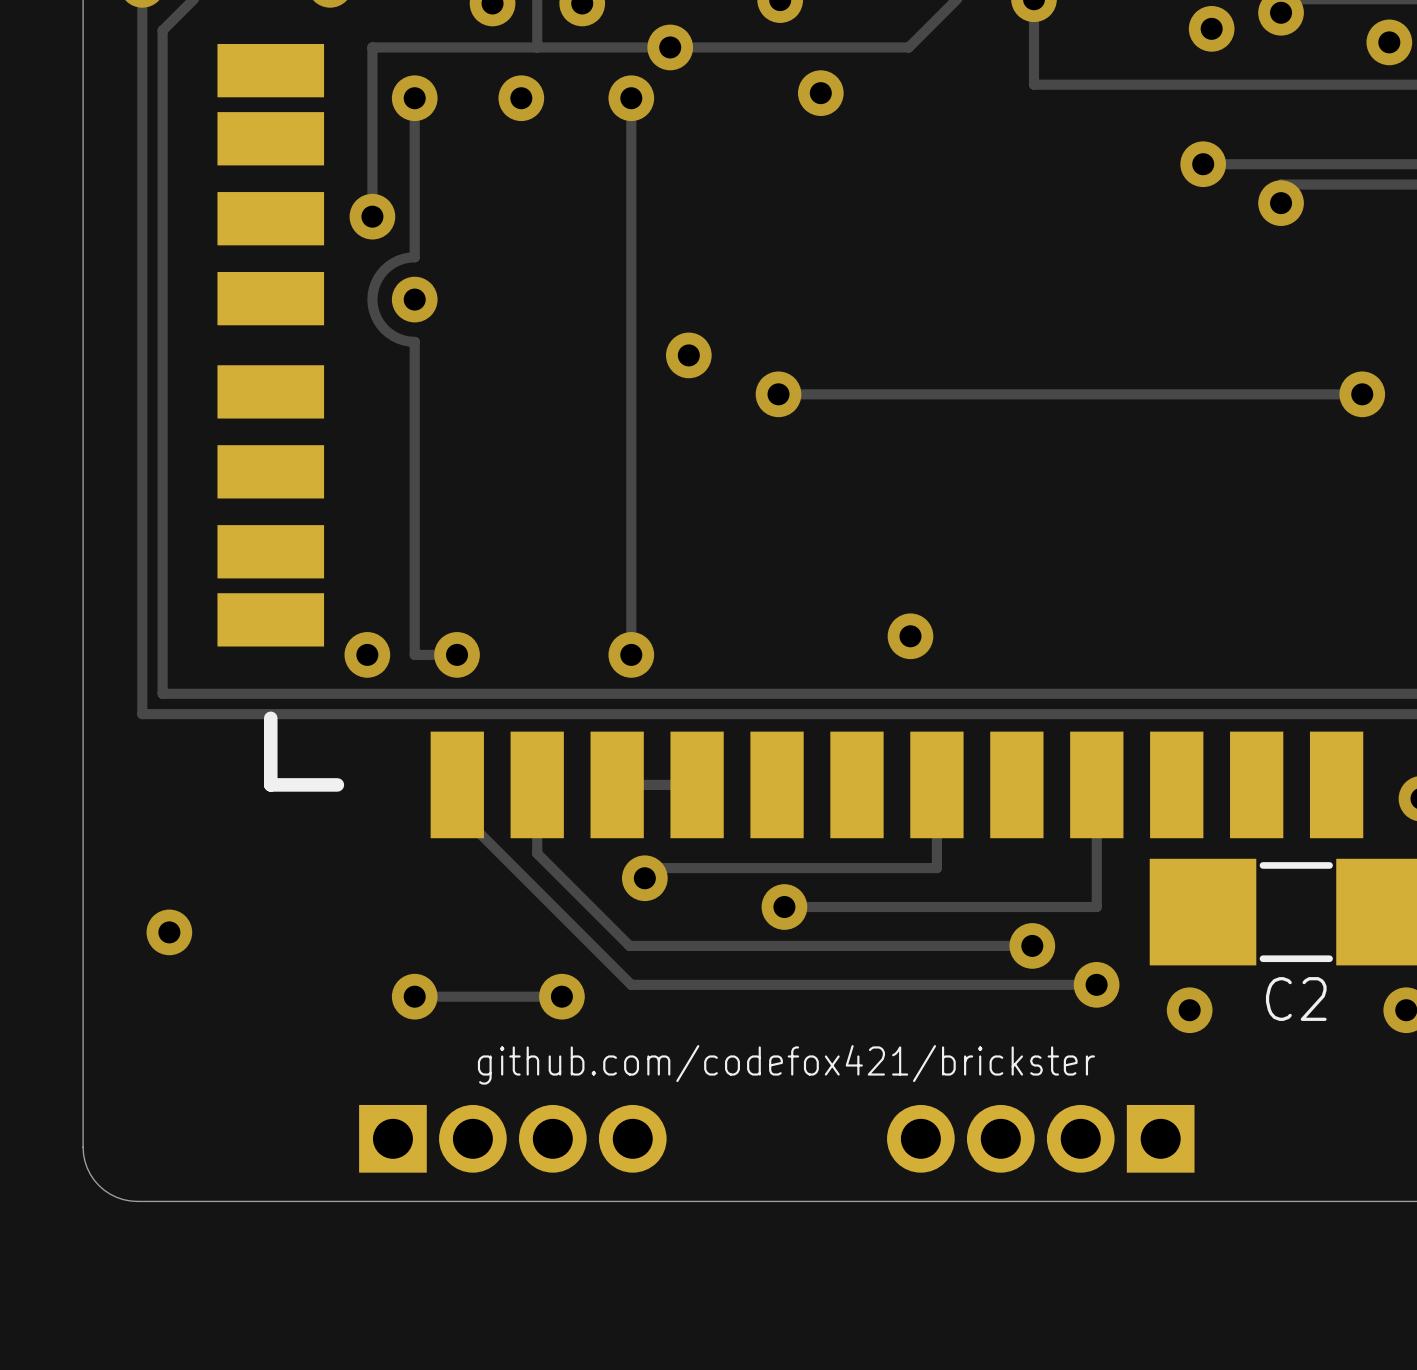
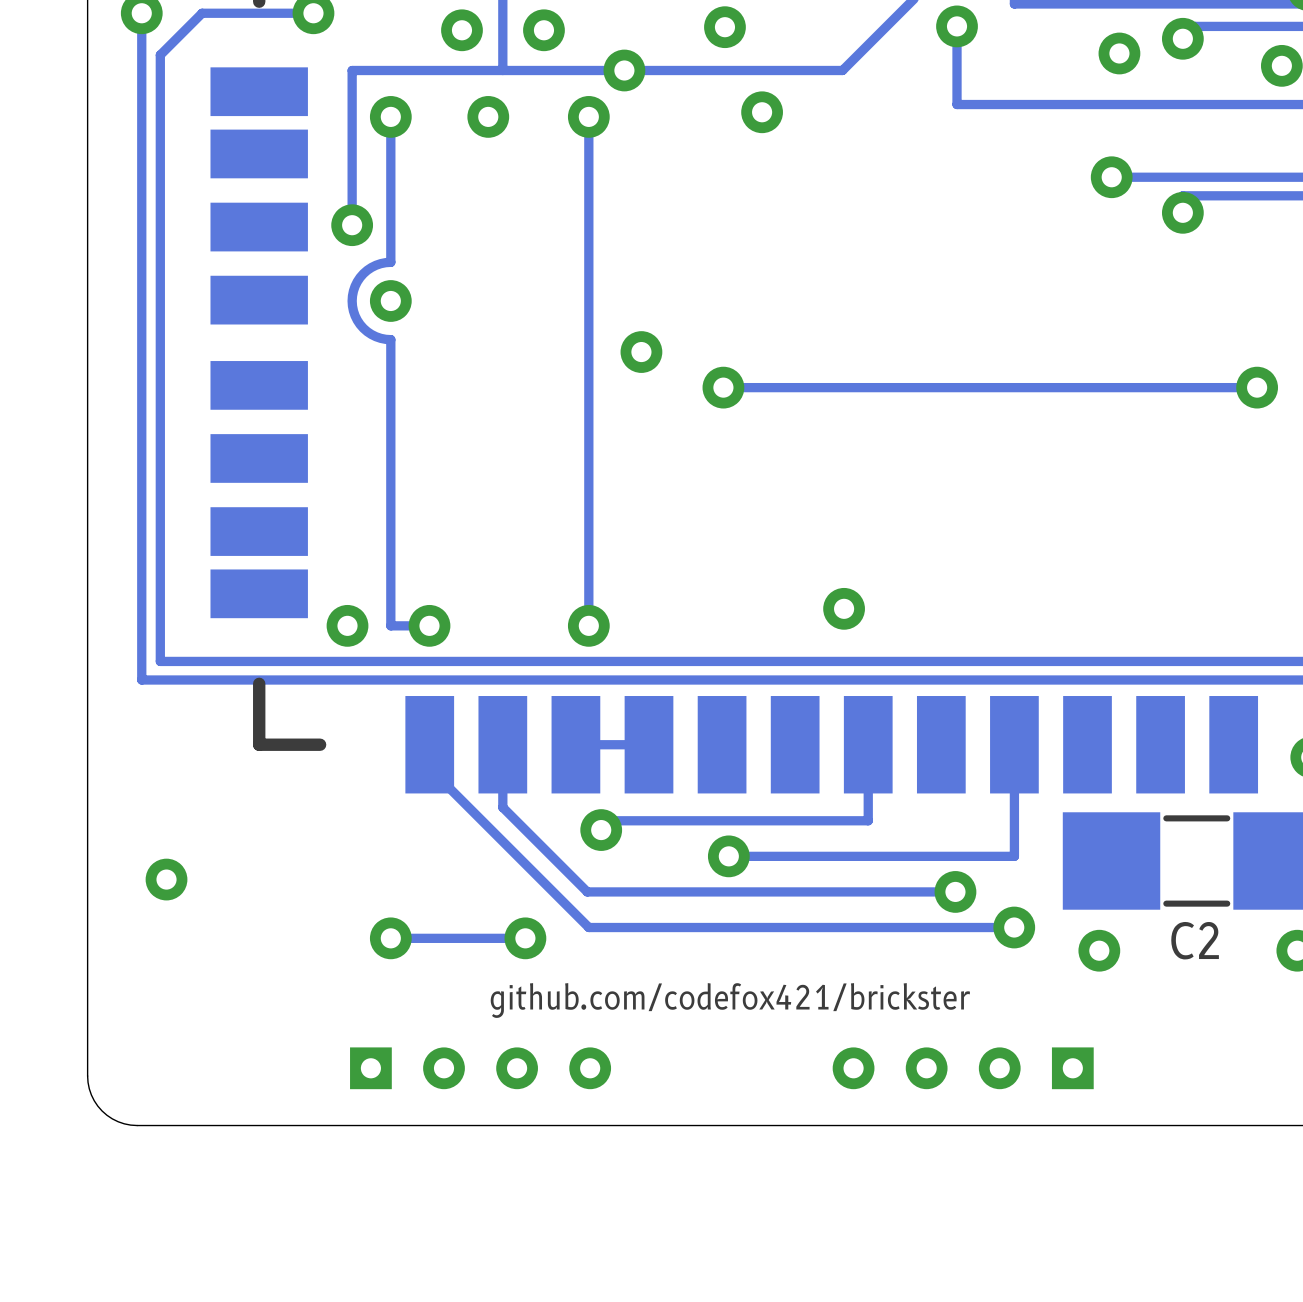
part footprint: [359, 1104, 667, 1173] -> [350, 1047, 612, 1090]
part footprint: [887, 1104, 1195, 1173] -> [832, 1047, 1094, 1090]

